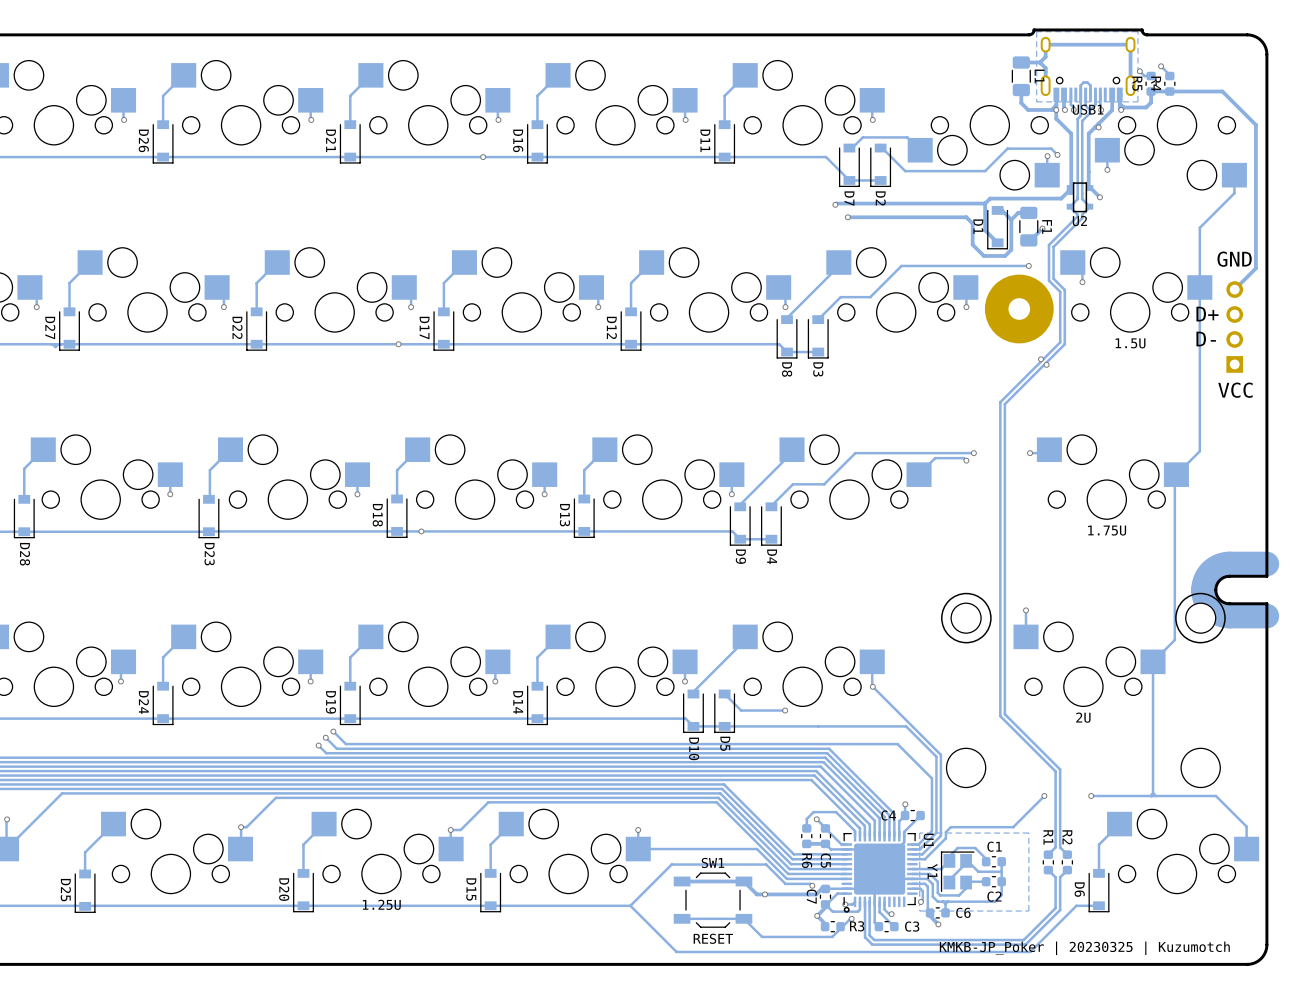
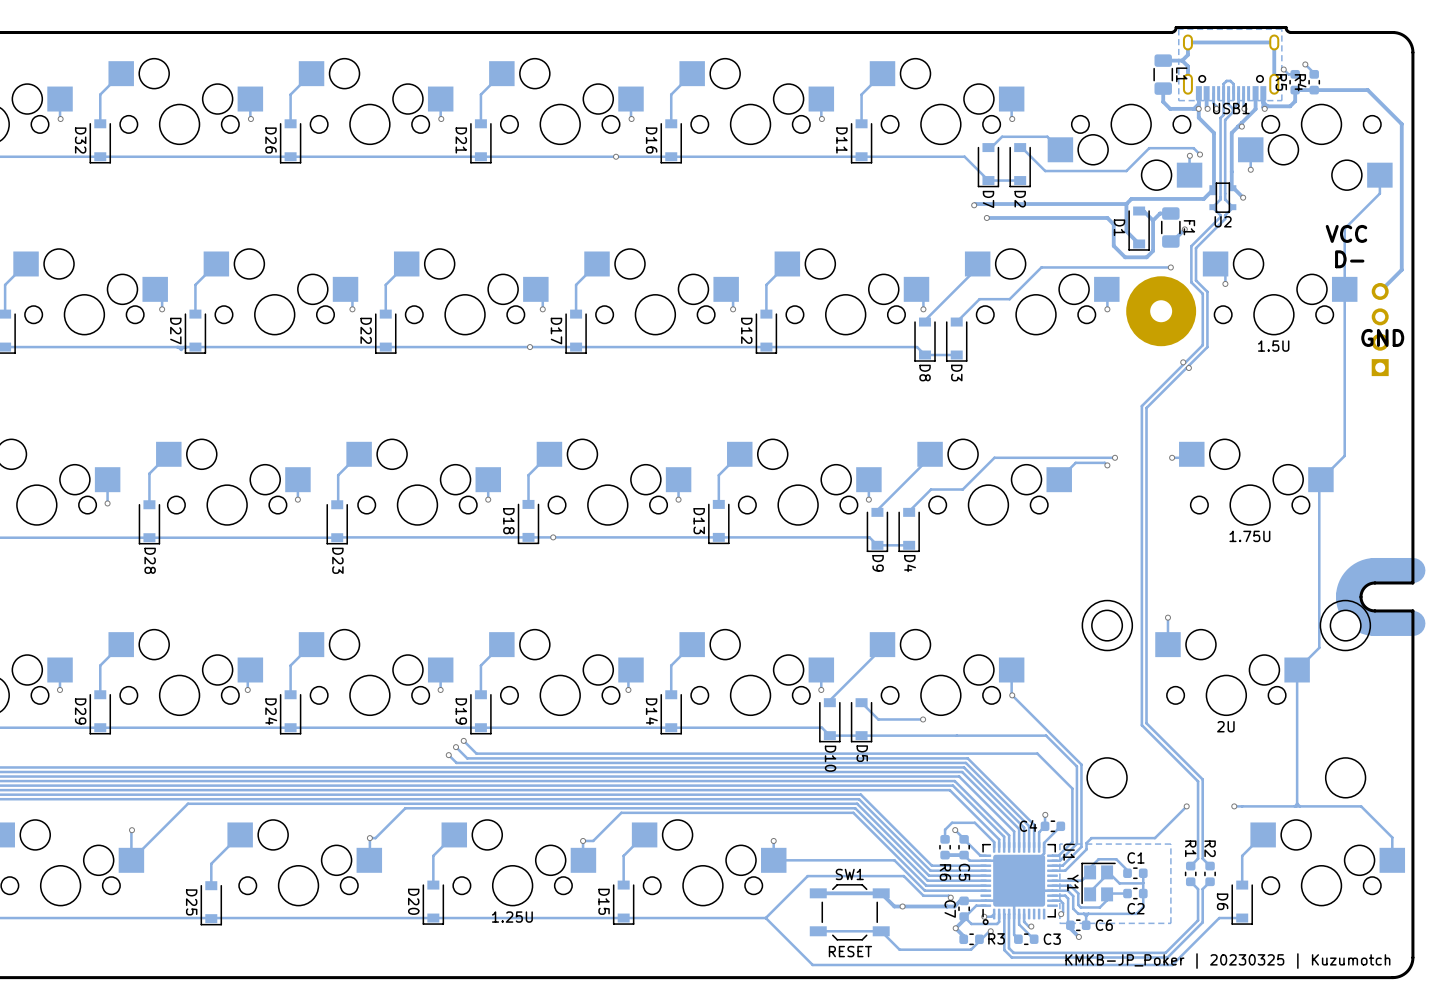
text position: GND (1234, 259) -> GND (1382, 337)
text: D+ (1207, 314) -> none
text position: D- (1206, 339) -> D- (1349, 259)
text position: VCC (1235, 390) -> VCC (1346, 233)

